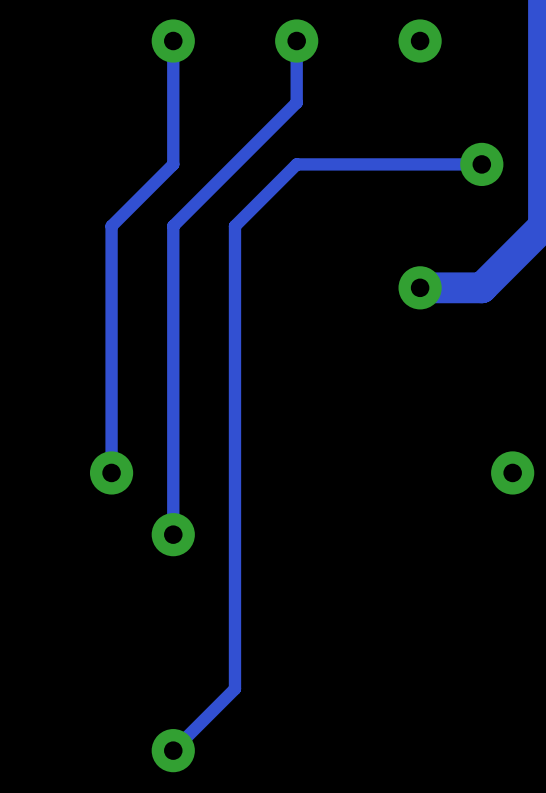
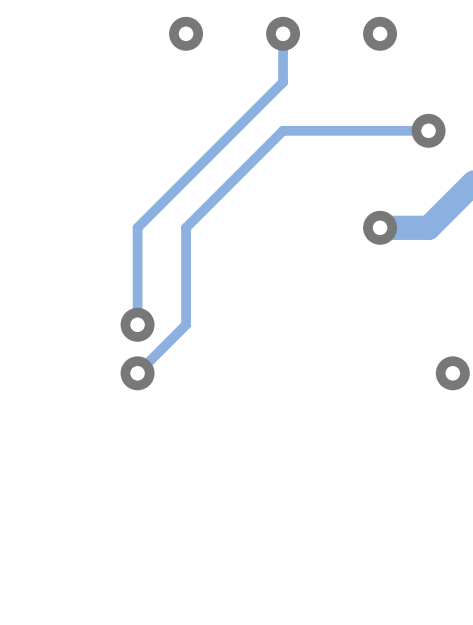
track: (173, 41) (173, 164) (111, 226) (111, 287) -> (186, 179) (137, 227)
track: (173, 226) (173, 287) -> (234, 179) (186, 227)
track: (234, 226) (234, 688) (173, 750) -> none
track: (111, 411) (111, 472) -> (186, 324) (137, 373)
track: (173, 411) (173, 534) -> none
via position: (173, 534) -> (137, 324)
via: (173, 750) -> none

